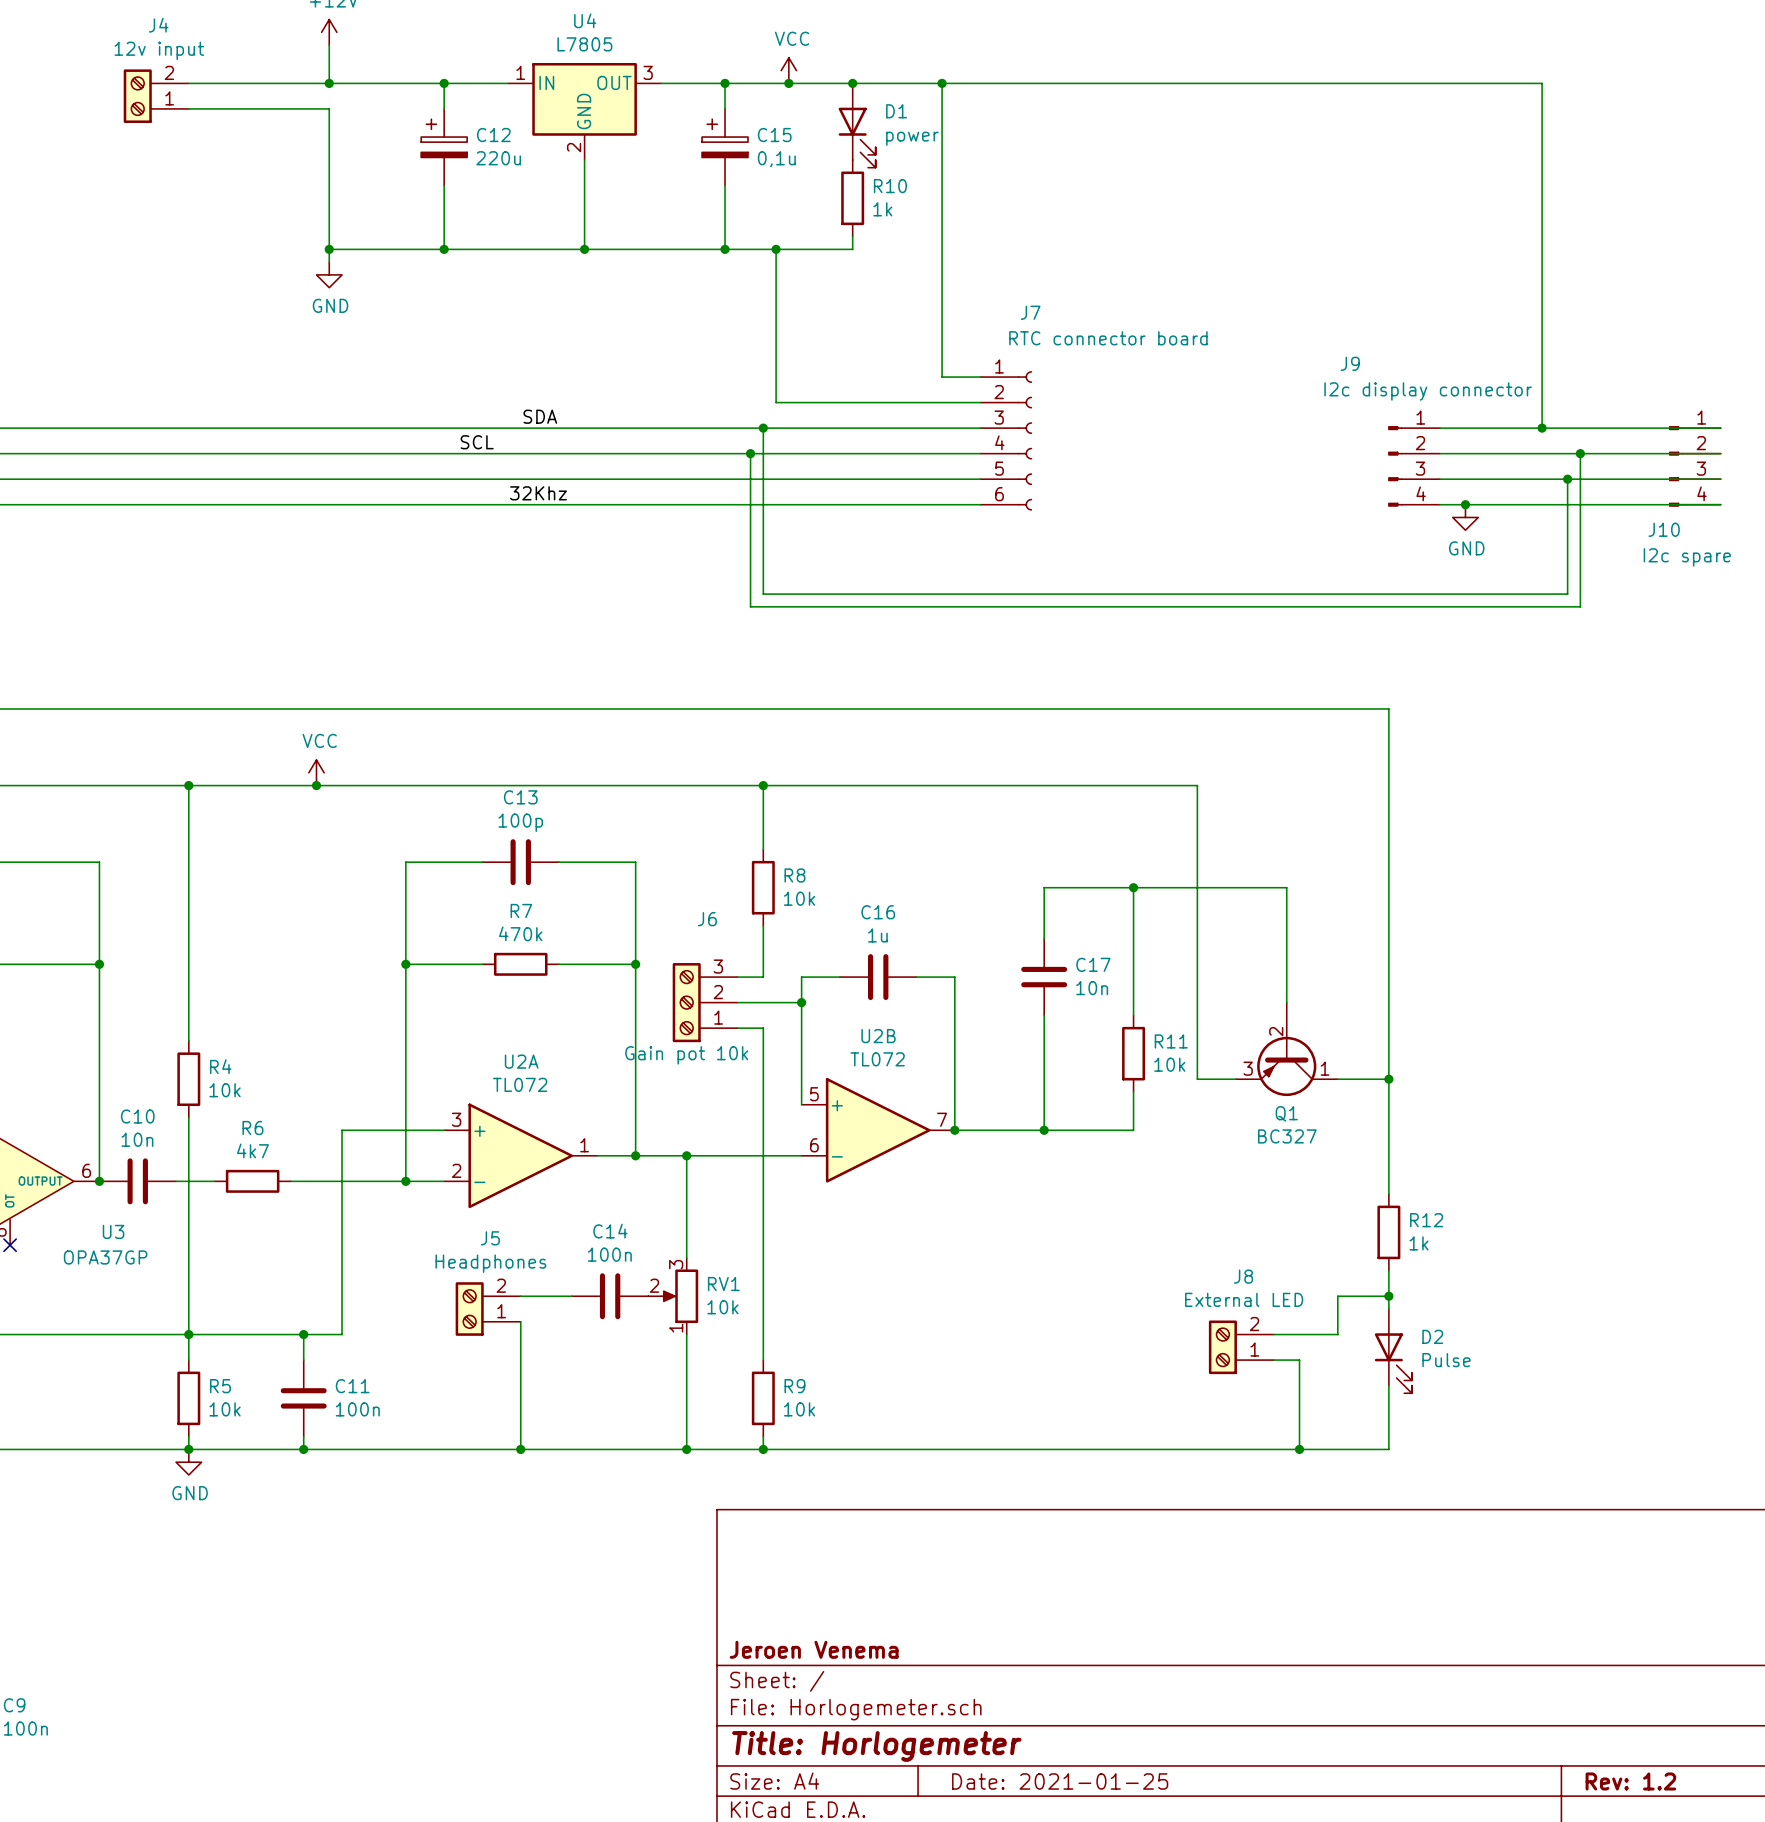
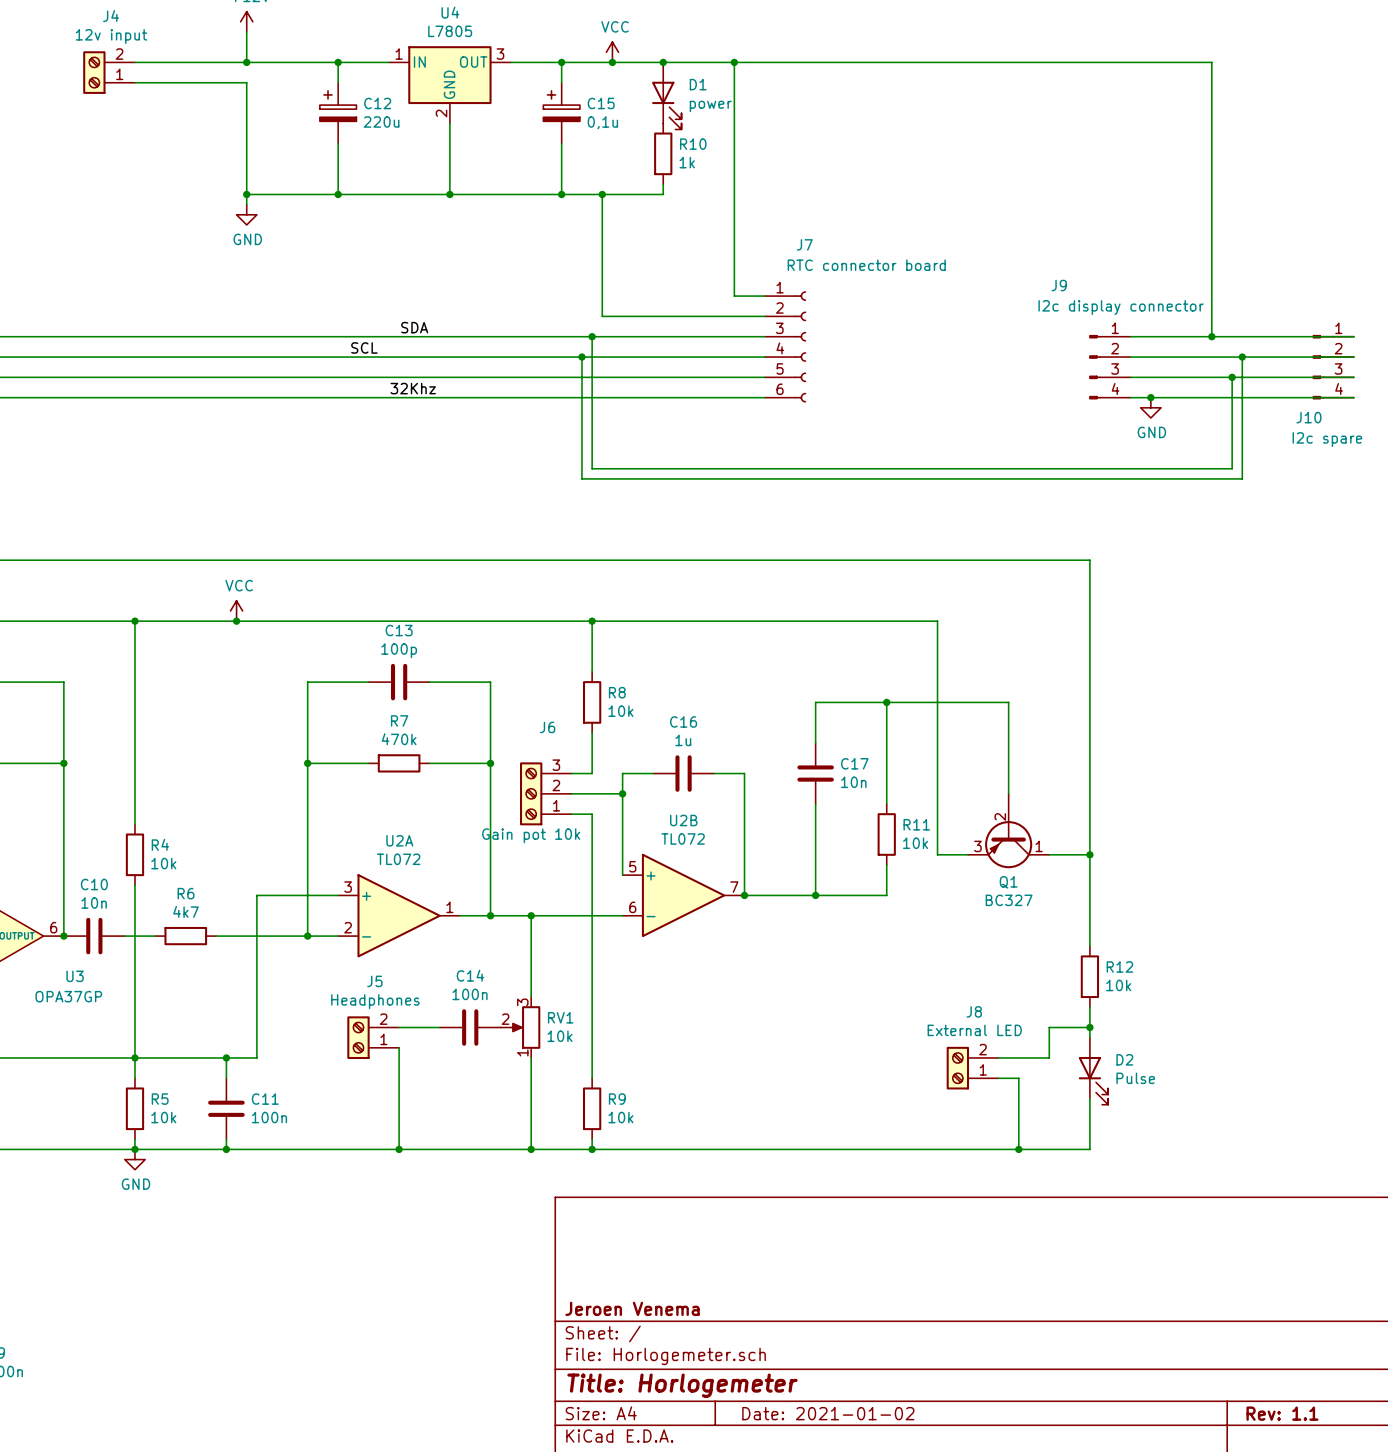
R12 value: 1k (1419, 1243) -> 10k (1118, 985)
title block: Date: 2021-01-25 (1060, 1781) -> Date: 2021-01-02 (828, 1413)
title block: Rev: 1.2 (1630, 1781) -> Rev: 1.1 (1282, 1413)

